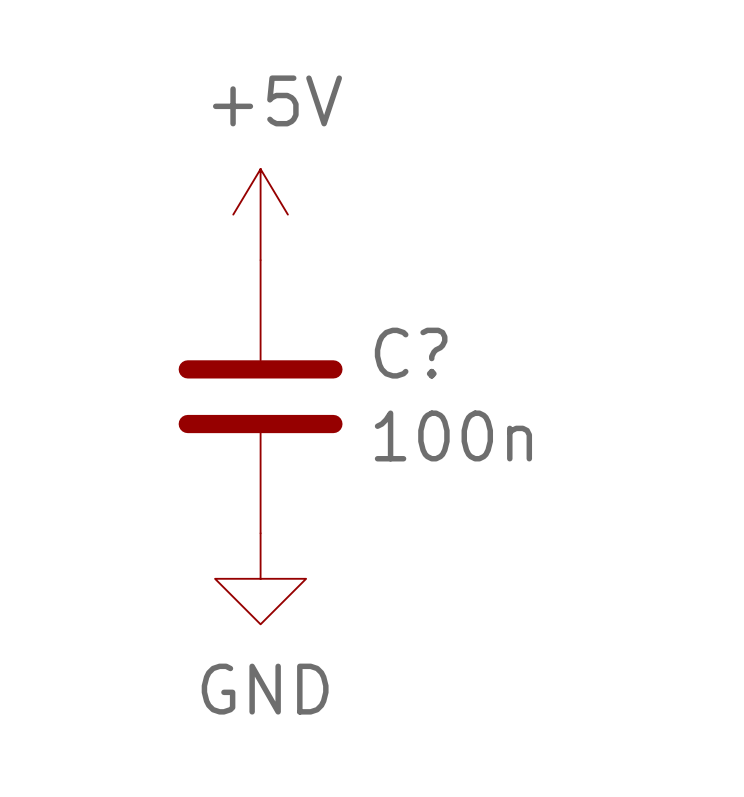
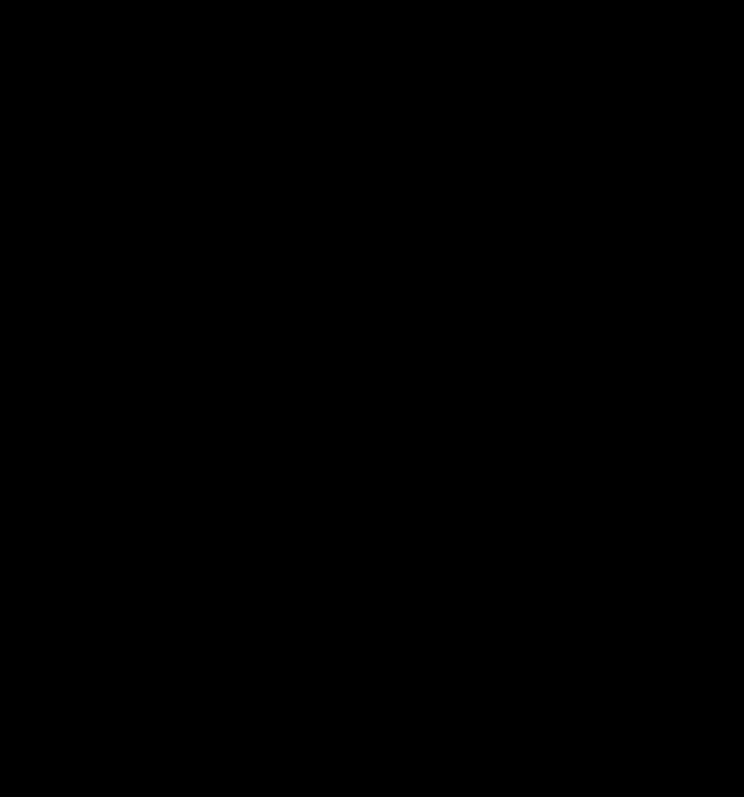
power symbol: +5V (260, 214) -> none
C?: 100n (260, 396) -> none
power symbol: GND (260, 578) -> none

